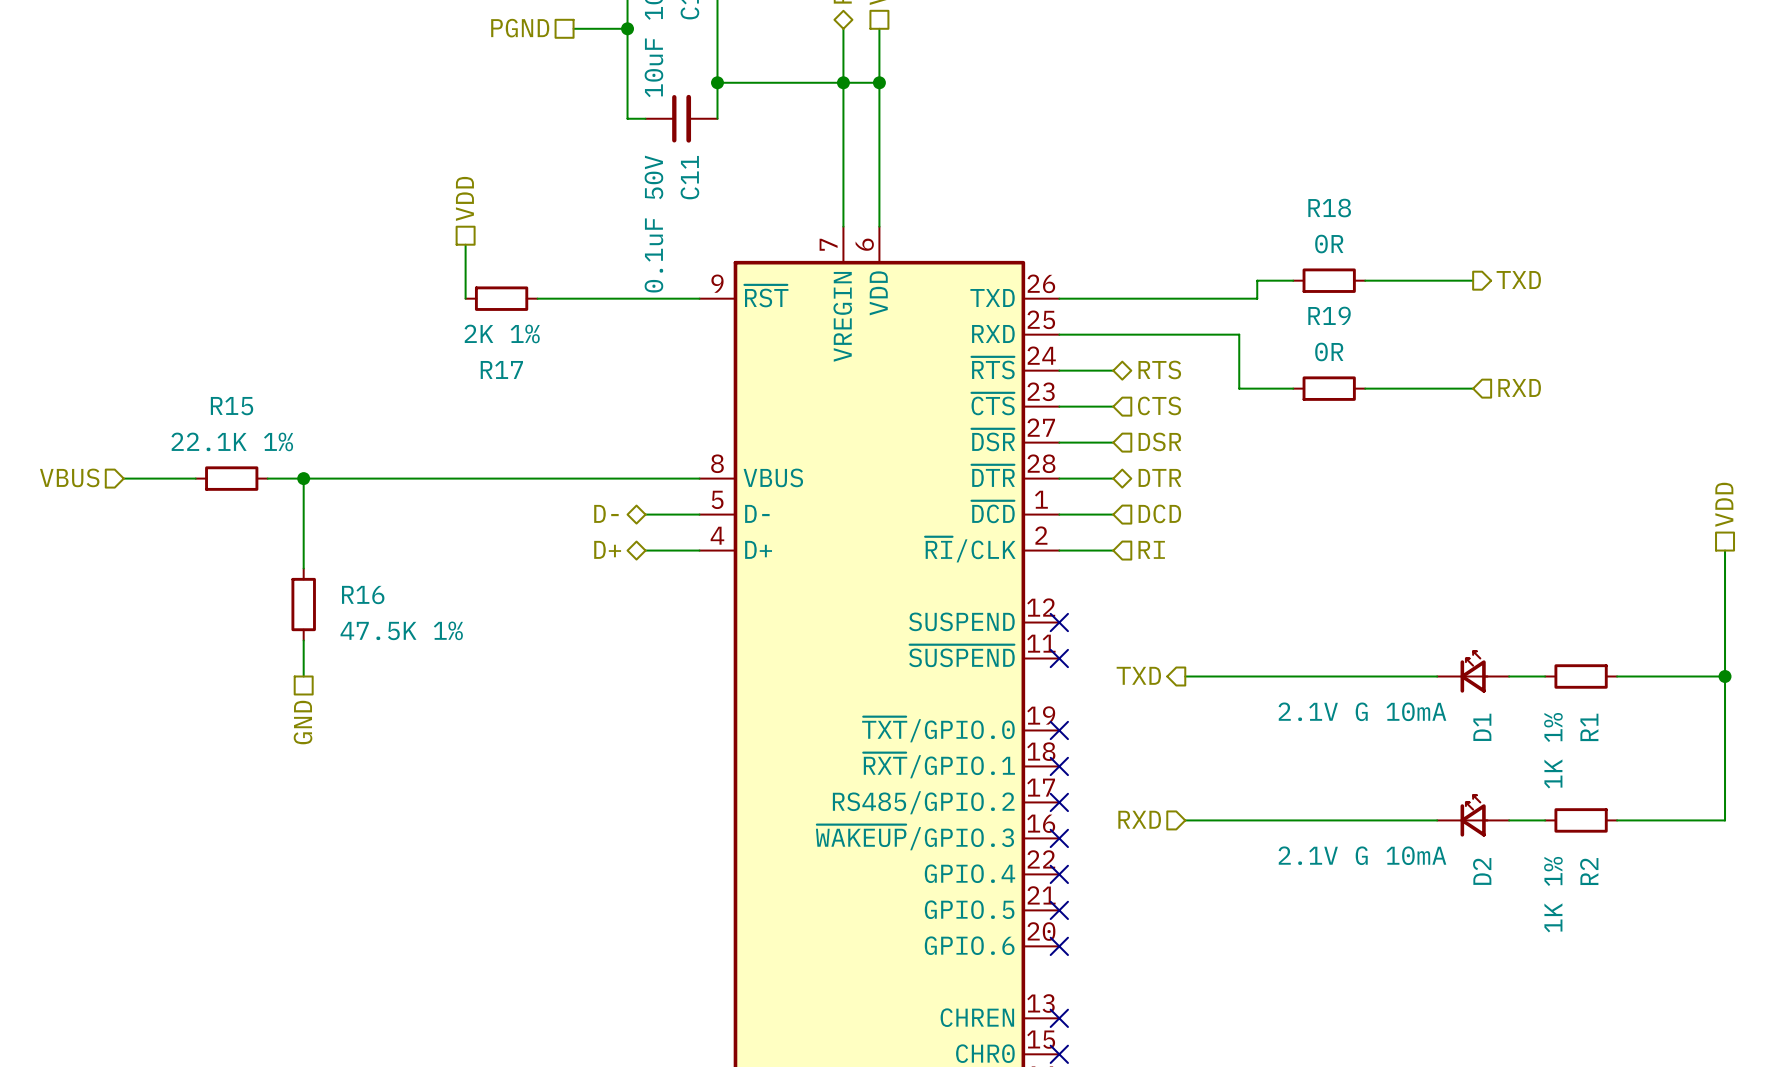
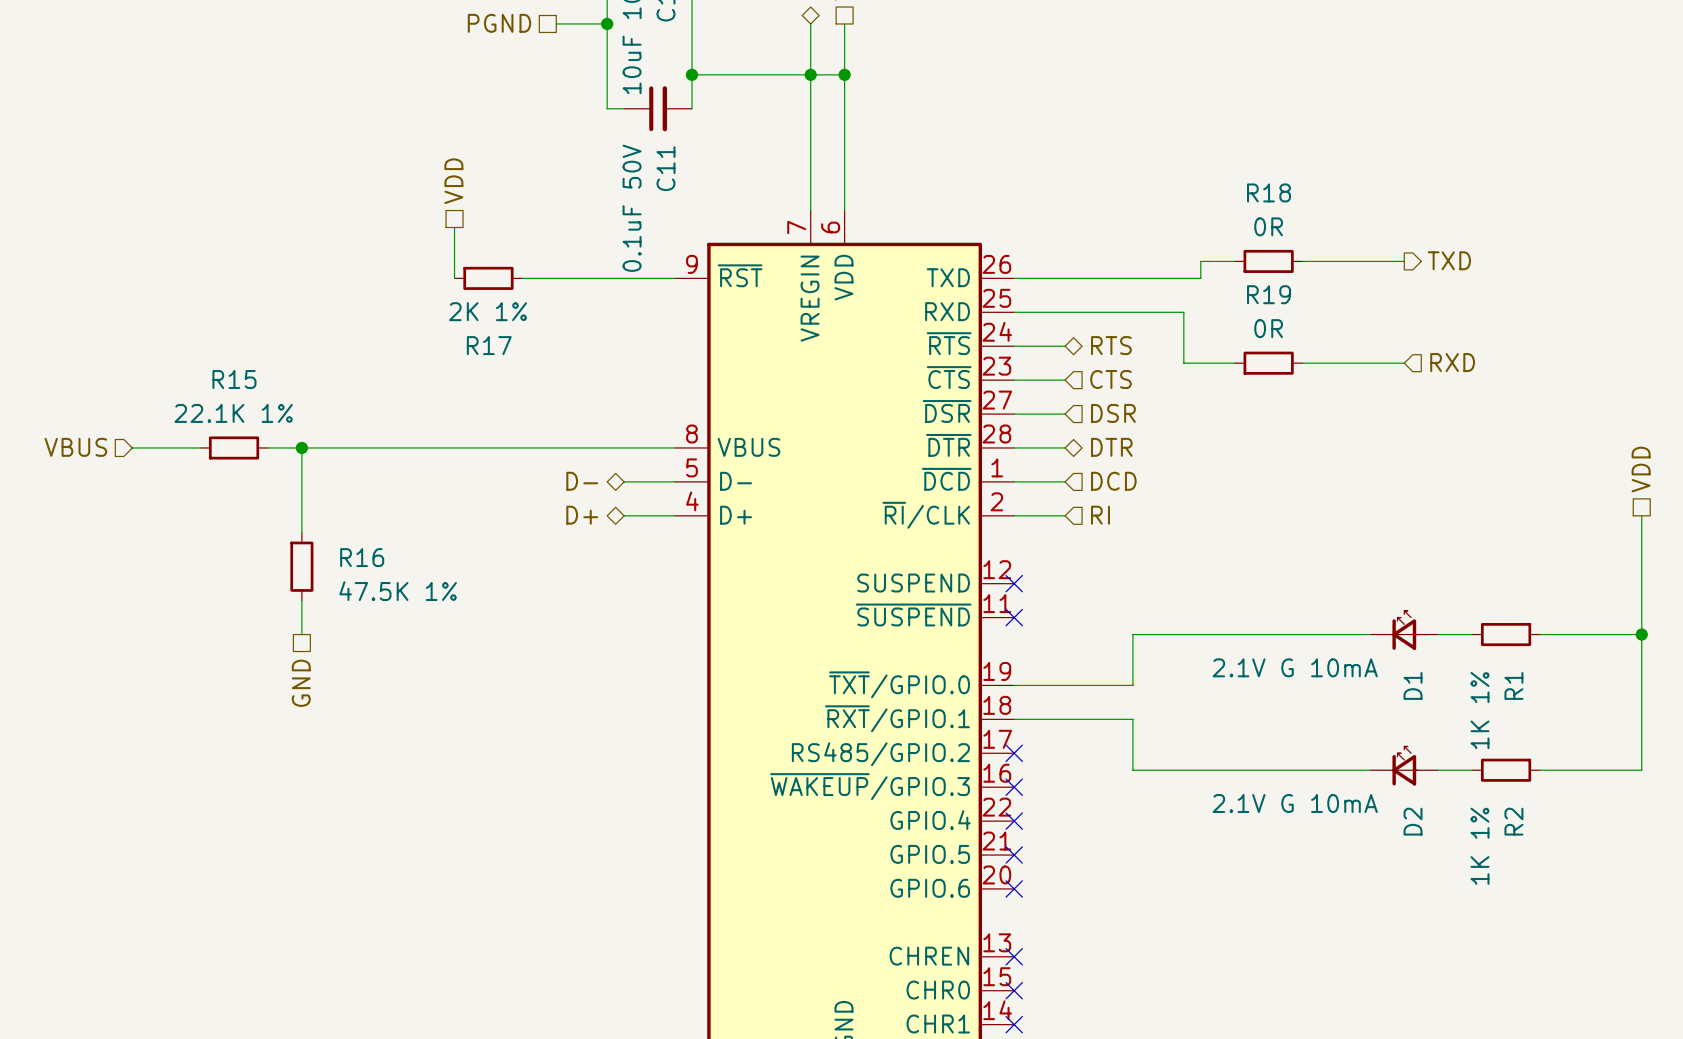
hierarchical label: TXD (1138, 675) -> none
wire: none -> (1132, 634) (1132, 685) (1014, 685)
no-connect mark: (1059, 730) -> none
wire: none -> (1014, 719) (1132, 719) (1132, 770)
no-connect mark: (1059, 766) -> none
hierarchical label: RXD (1139, 819) -> none

